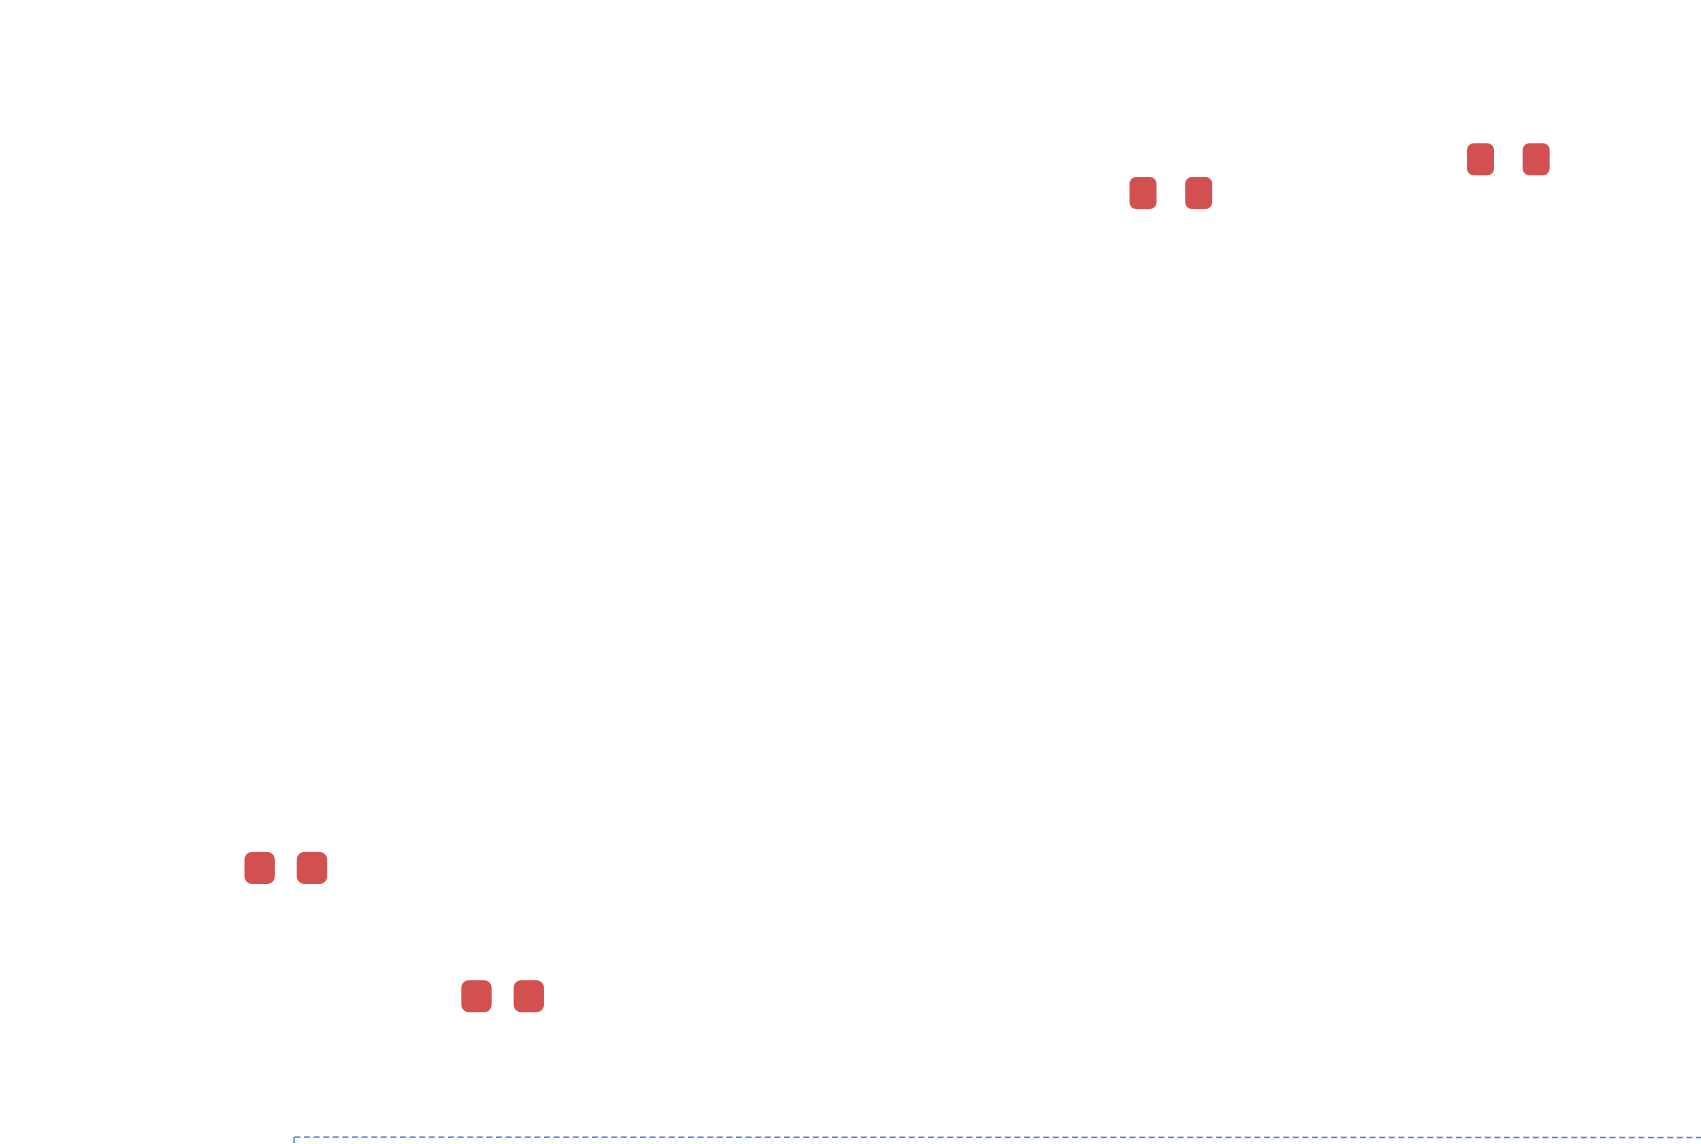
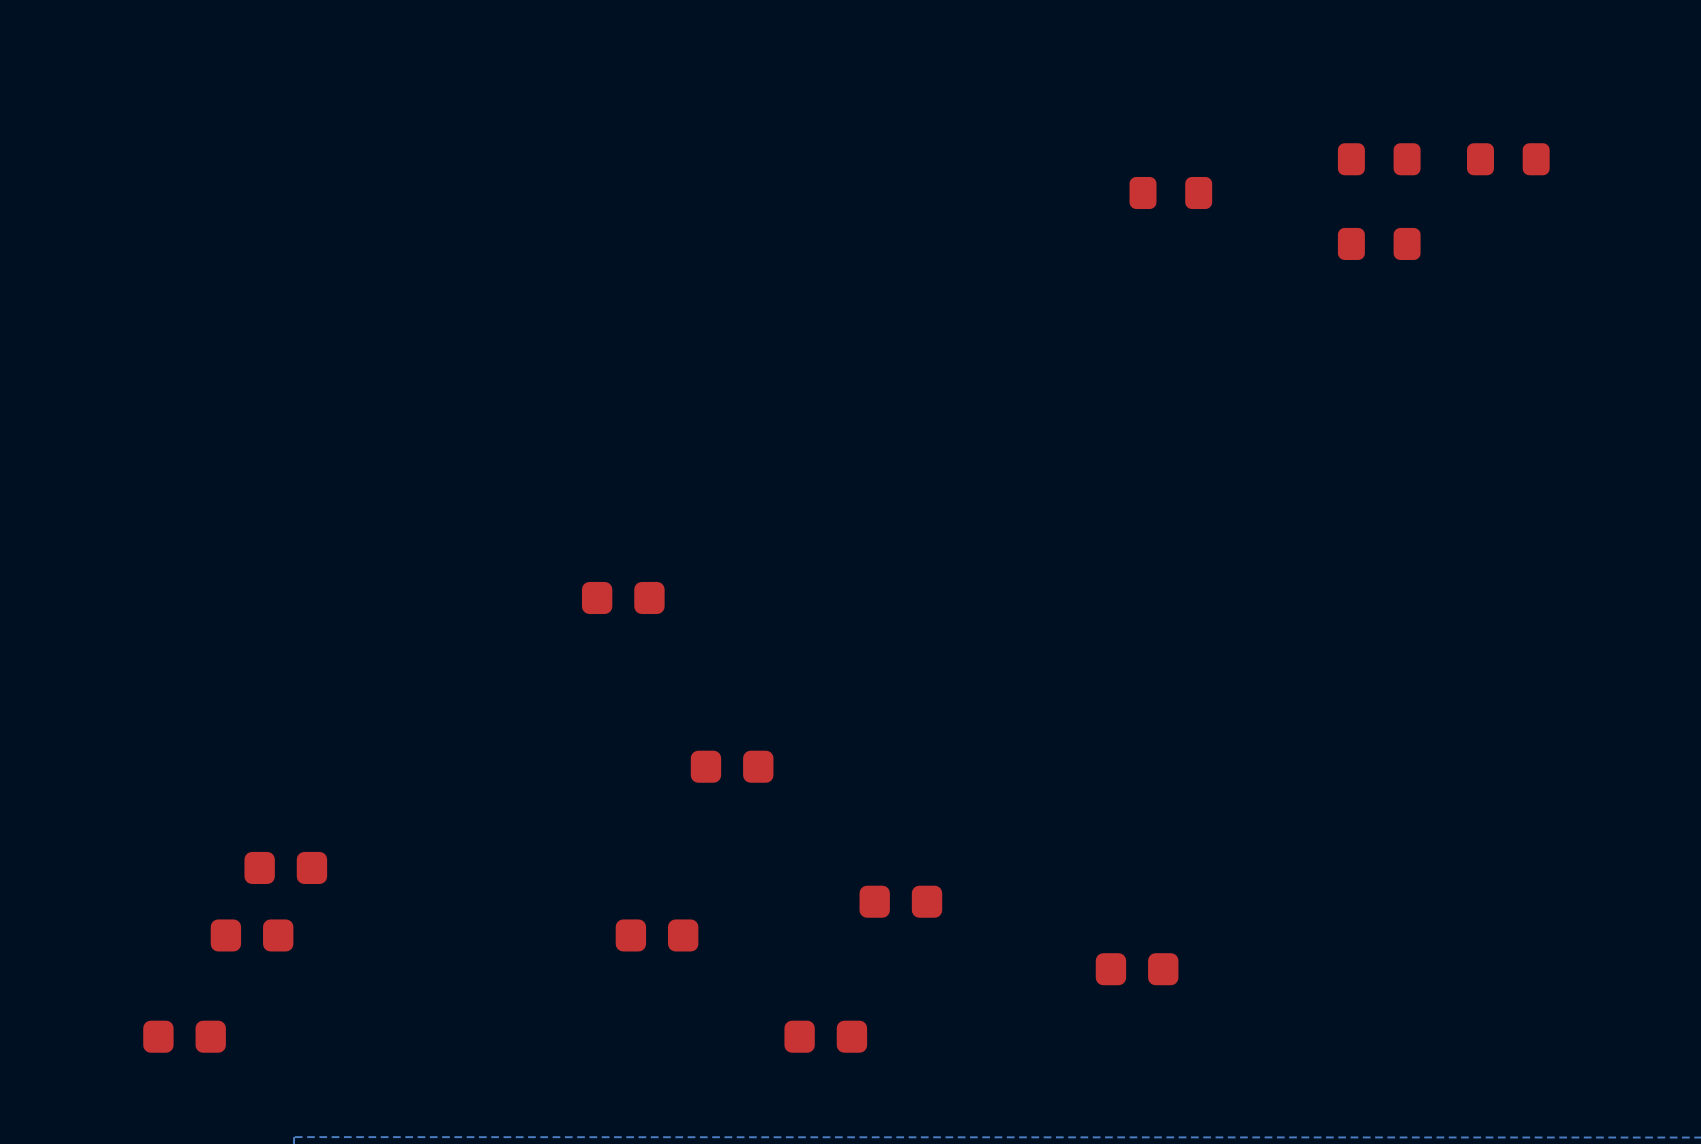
part: none -> (1379, 159)
part: none -> (1379, 243)
part: none -> (623, 597)
part: none -> (732, 766)
part: none -> (900, 901)
part: none -> (252, 935)
part: none -> (657, 935)
part: none -> (1137, 969)
part: (502, 996) -> none
part: none -> (184, 1036)
part: none -> (825, 1036)

